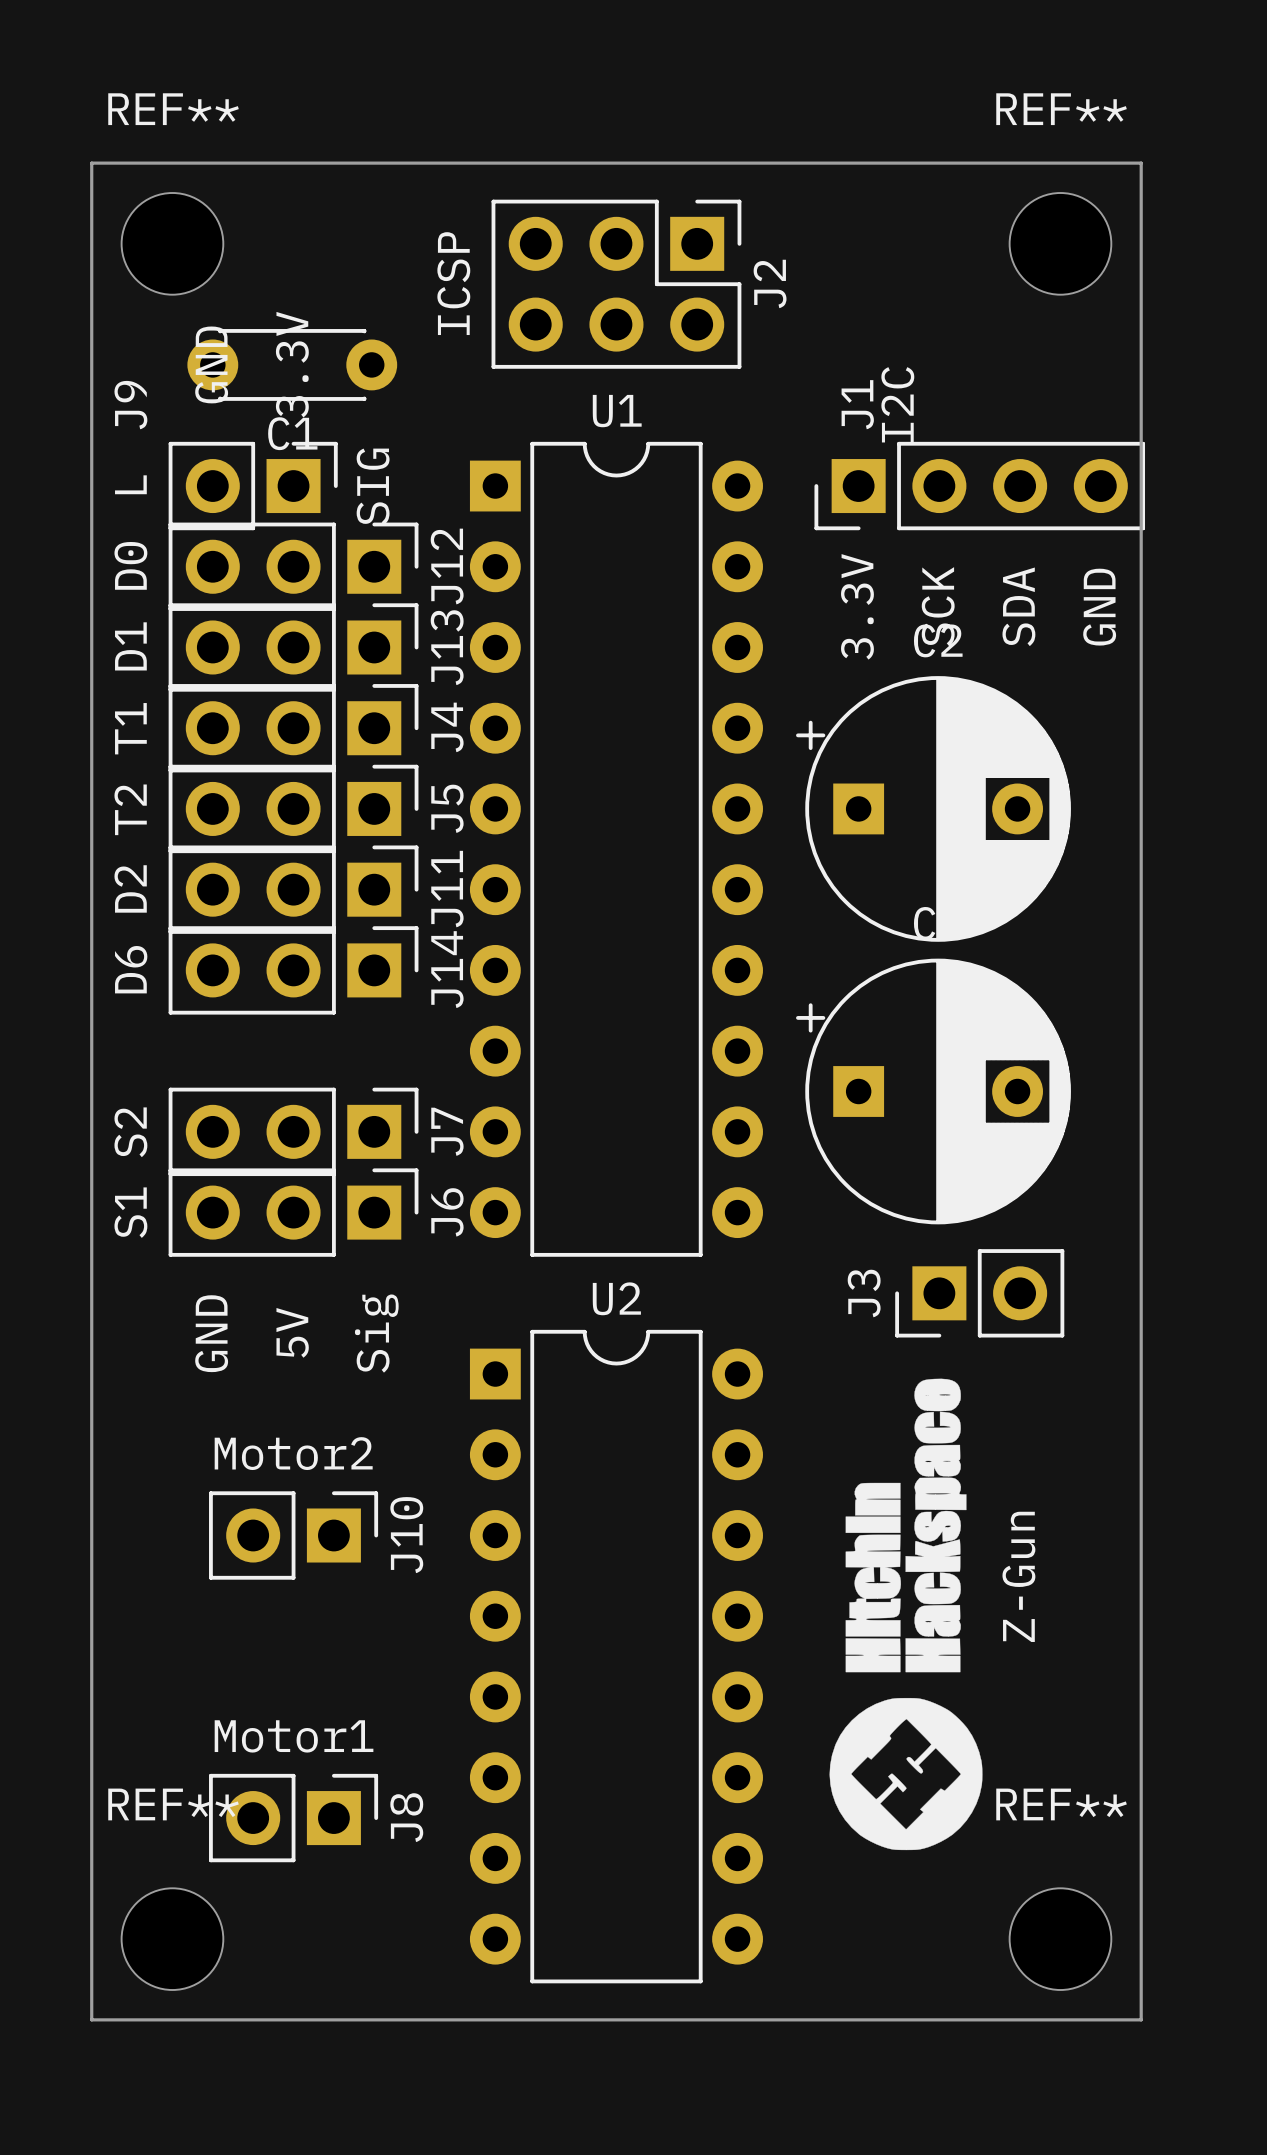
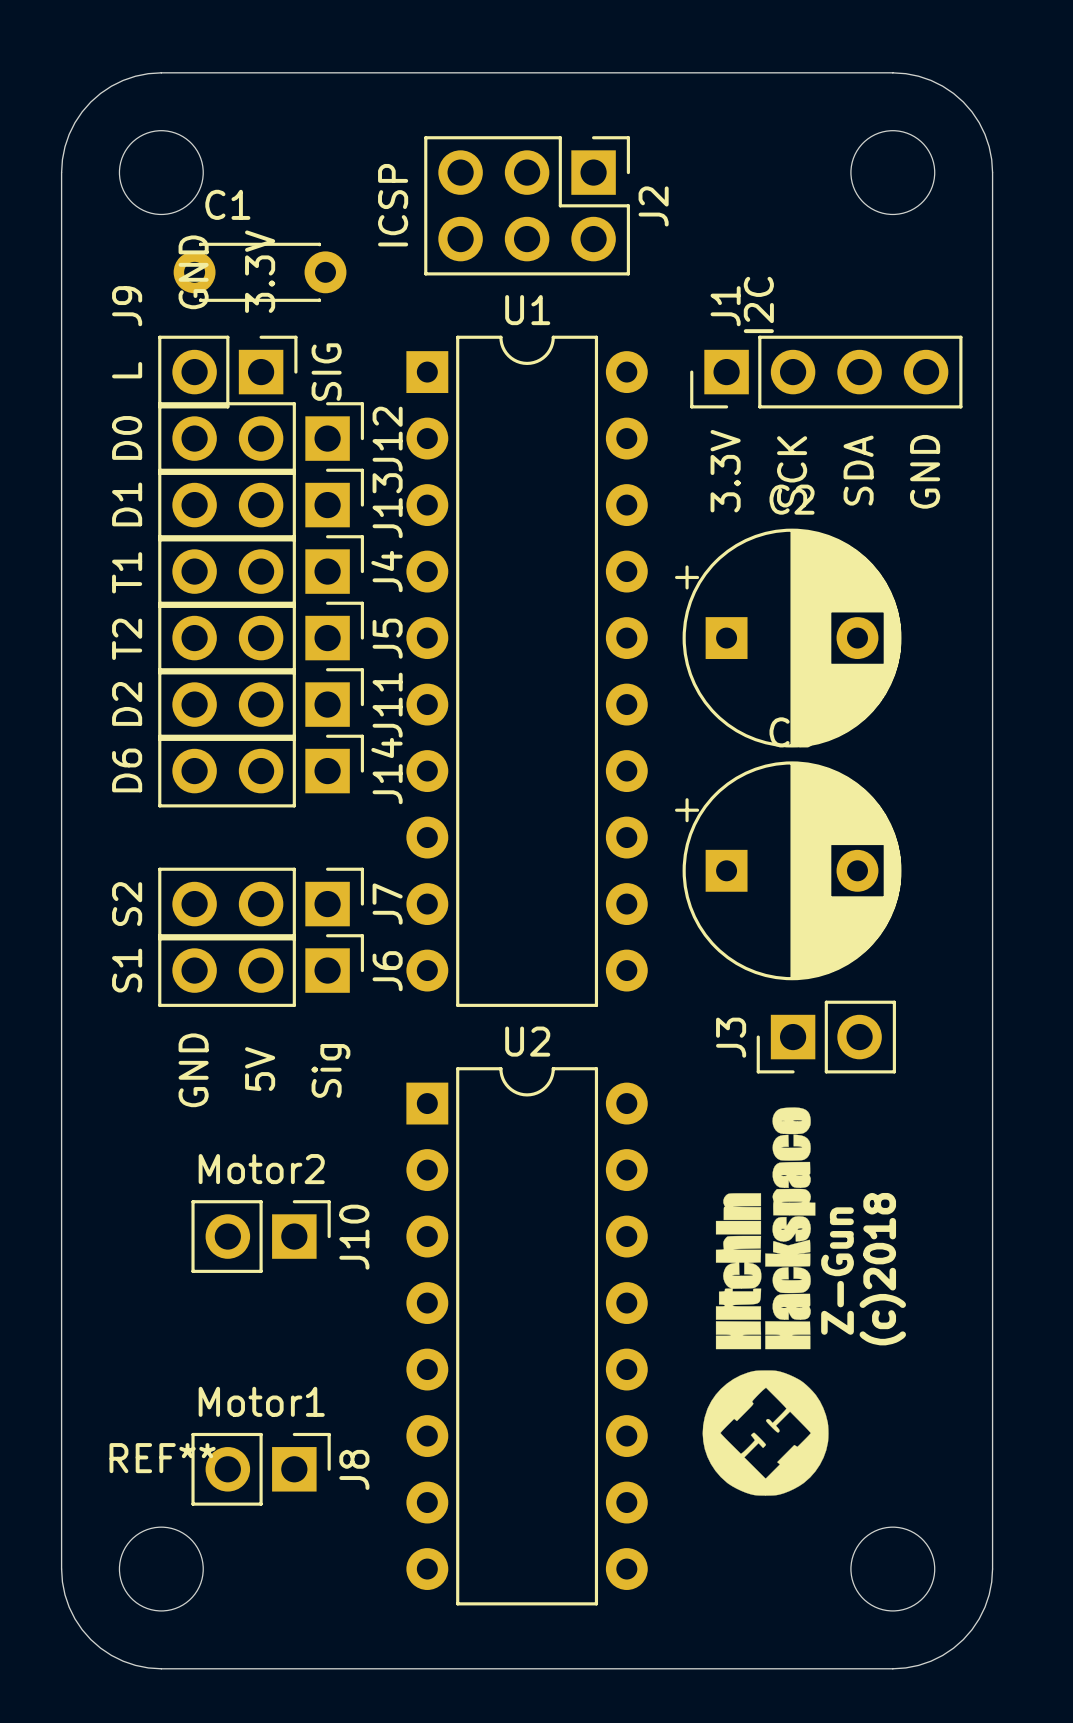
REF** name: REF** (173, 109) -> none
REF** name: REF** (1061, 109) -> none
board edge: (91, 163) (91, 2019) (1141, 2019) (1141, 163) (91, 163) -> (161, 72) (135, 76) (123, 80) (100, 93) (90, 102) (74, 122) (69, 134) (62, 159) (61, 172) (61, 1569) (62, 1582) (69, 1607) (74, 1618) (90, 1639) (111, 1655) (135, 1665) (161, 1668) (892, 1668) (905, 1667) (930, 1661) (942, 1655) (963, 1639) (979, 1618) (989, 1594) (992, 1569) (992, 172) (991, 159) (984, 134) (971, 111) (953, 93) (930, 80) (905, 73) (161, 72)
C1 name position: C1 (292, 433) -> C1 (227, 204)
text: none -> (c)2018 (882, 1269)
text position: Z-Gun (1018, 1576) -> Z-Gun (837, 1271)
REF** name: REF** (1061, 1804) -> none

